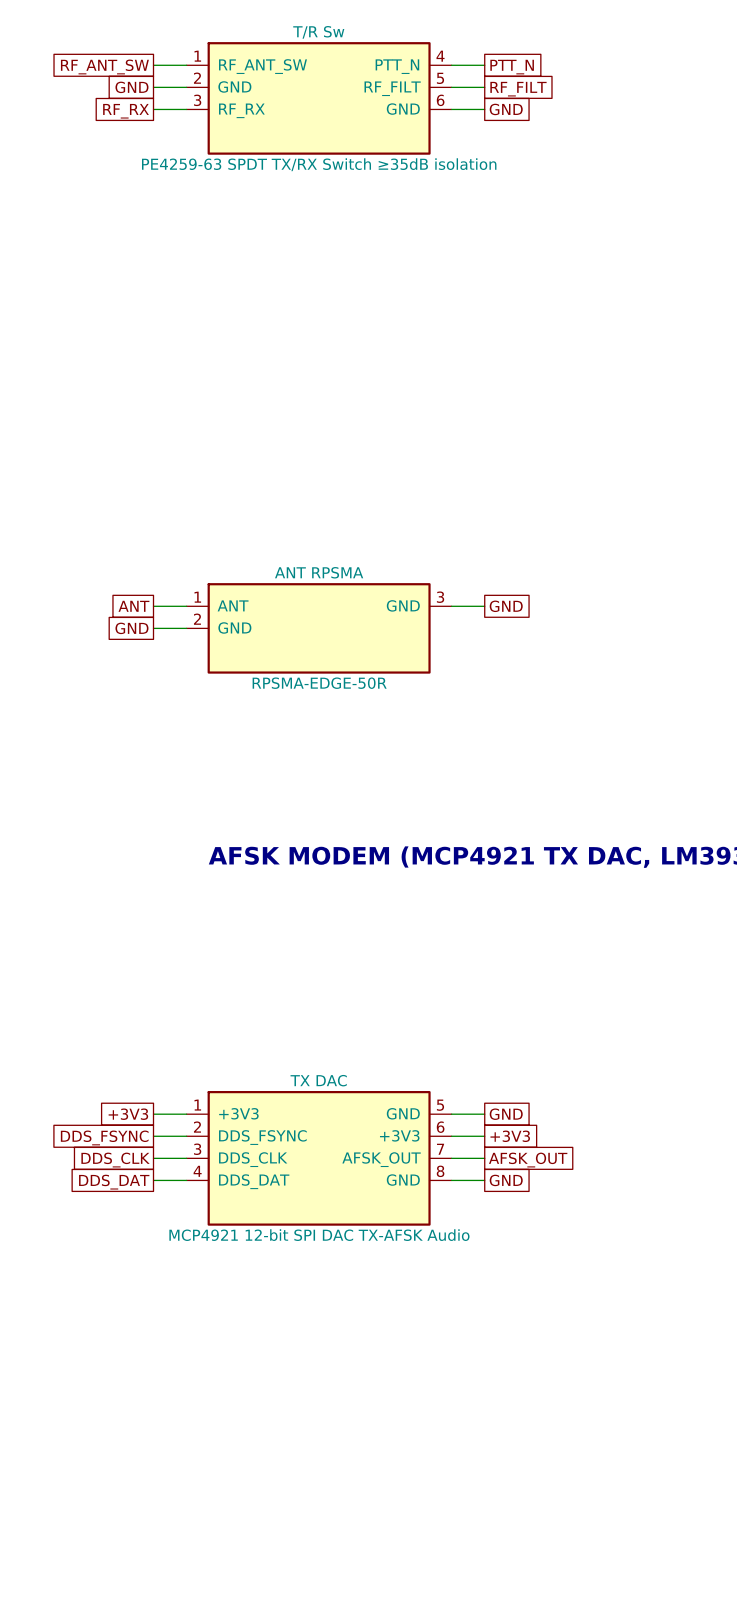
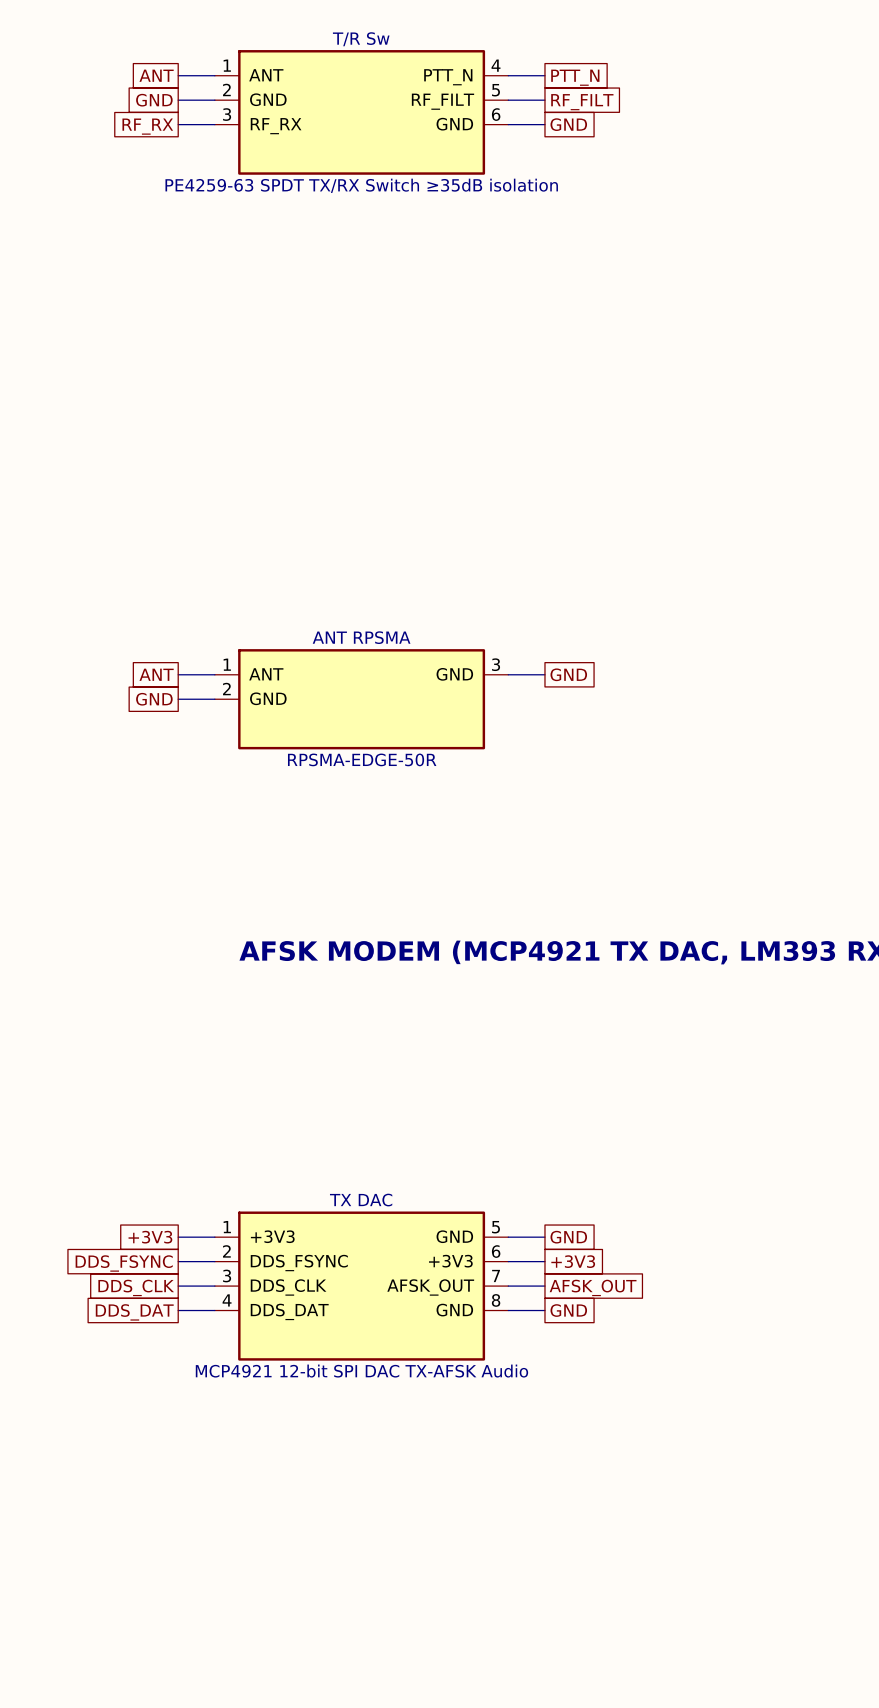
global label: RF_ANT_SW (104, 66) -> ANT (156, 75)
T/R Sw pin name: RF_ANT_SW (262, 66) -> ANT (266, 75)

